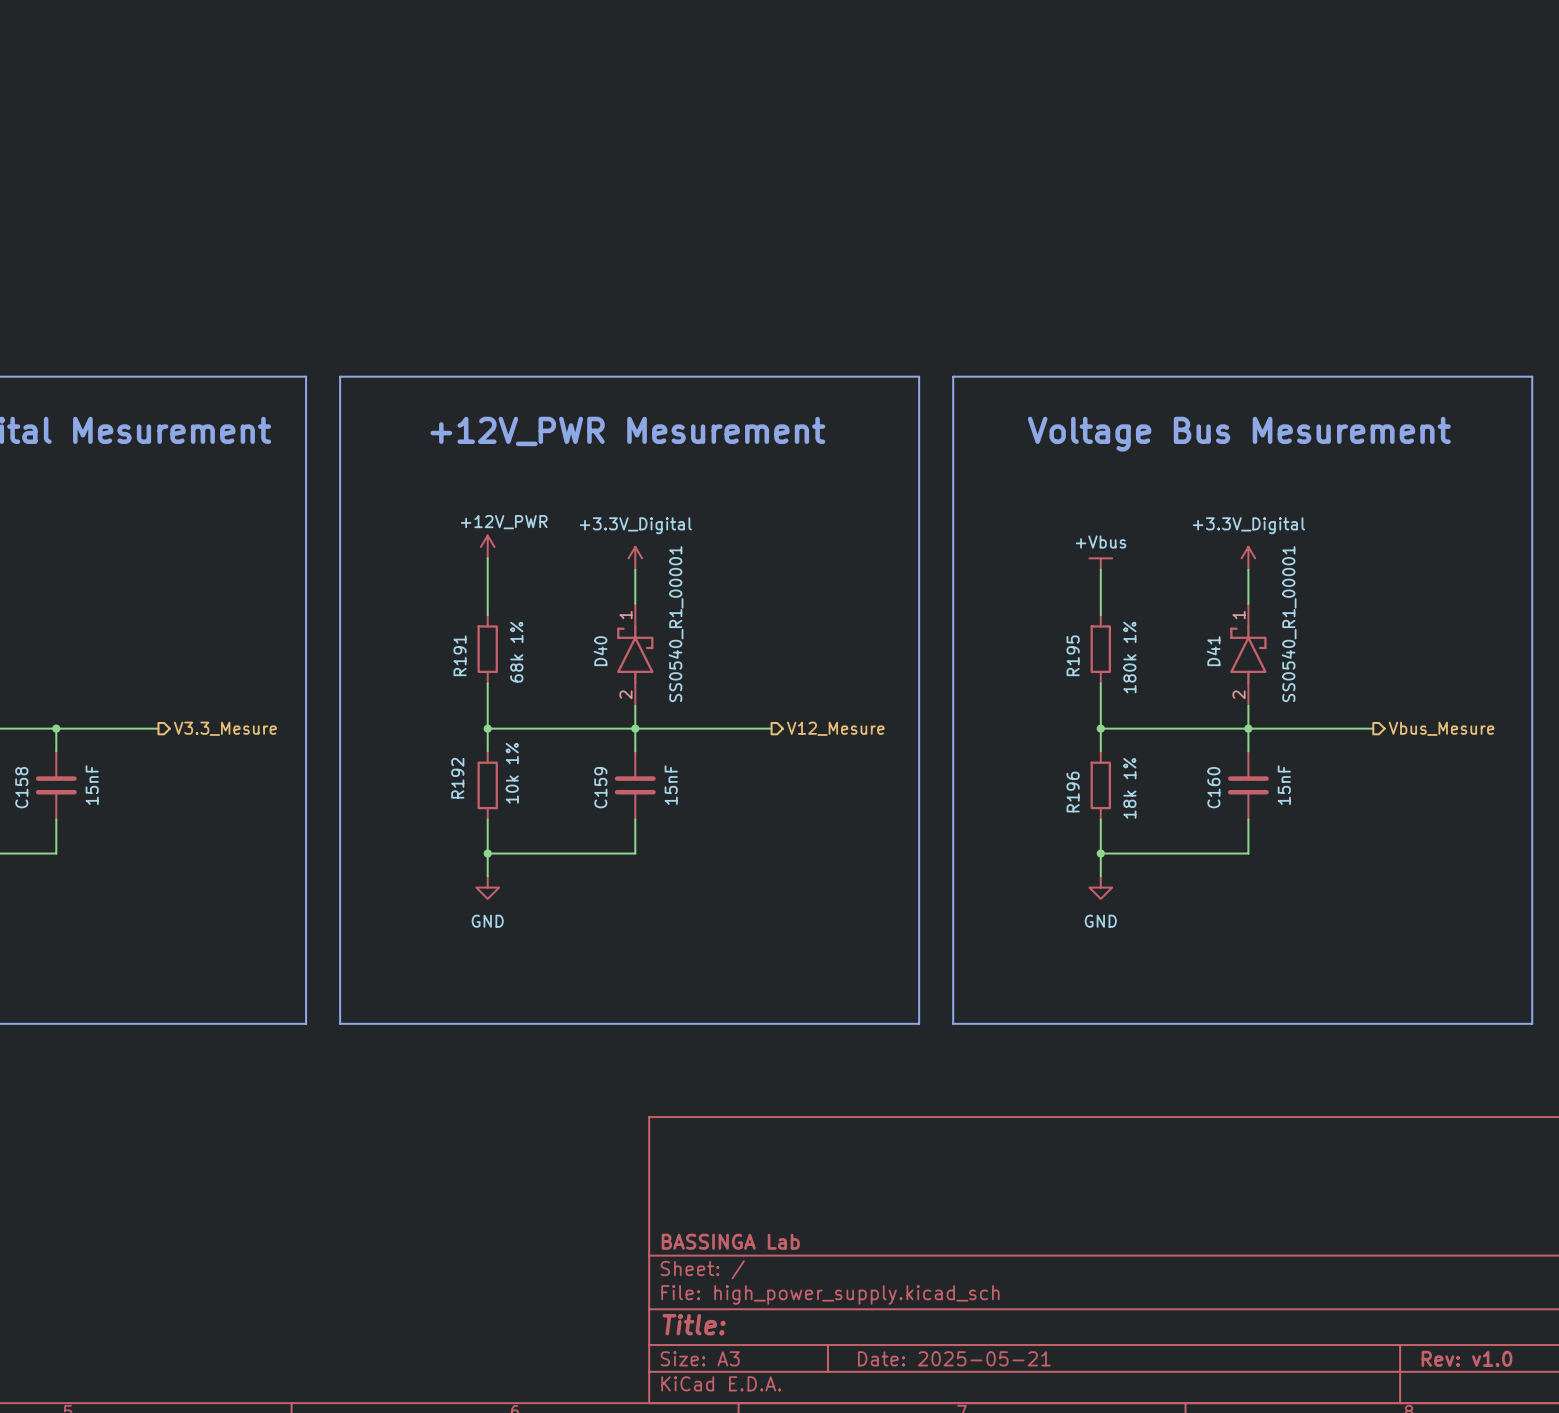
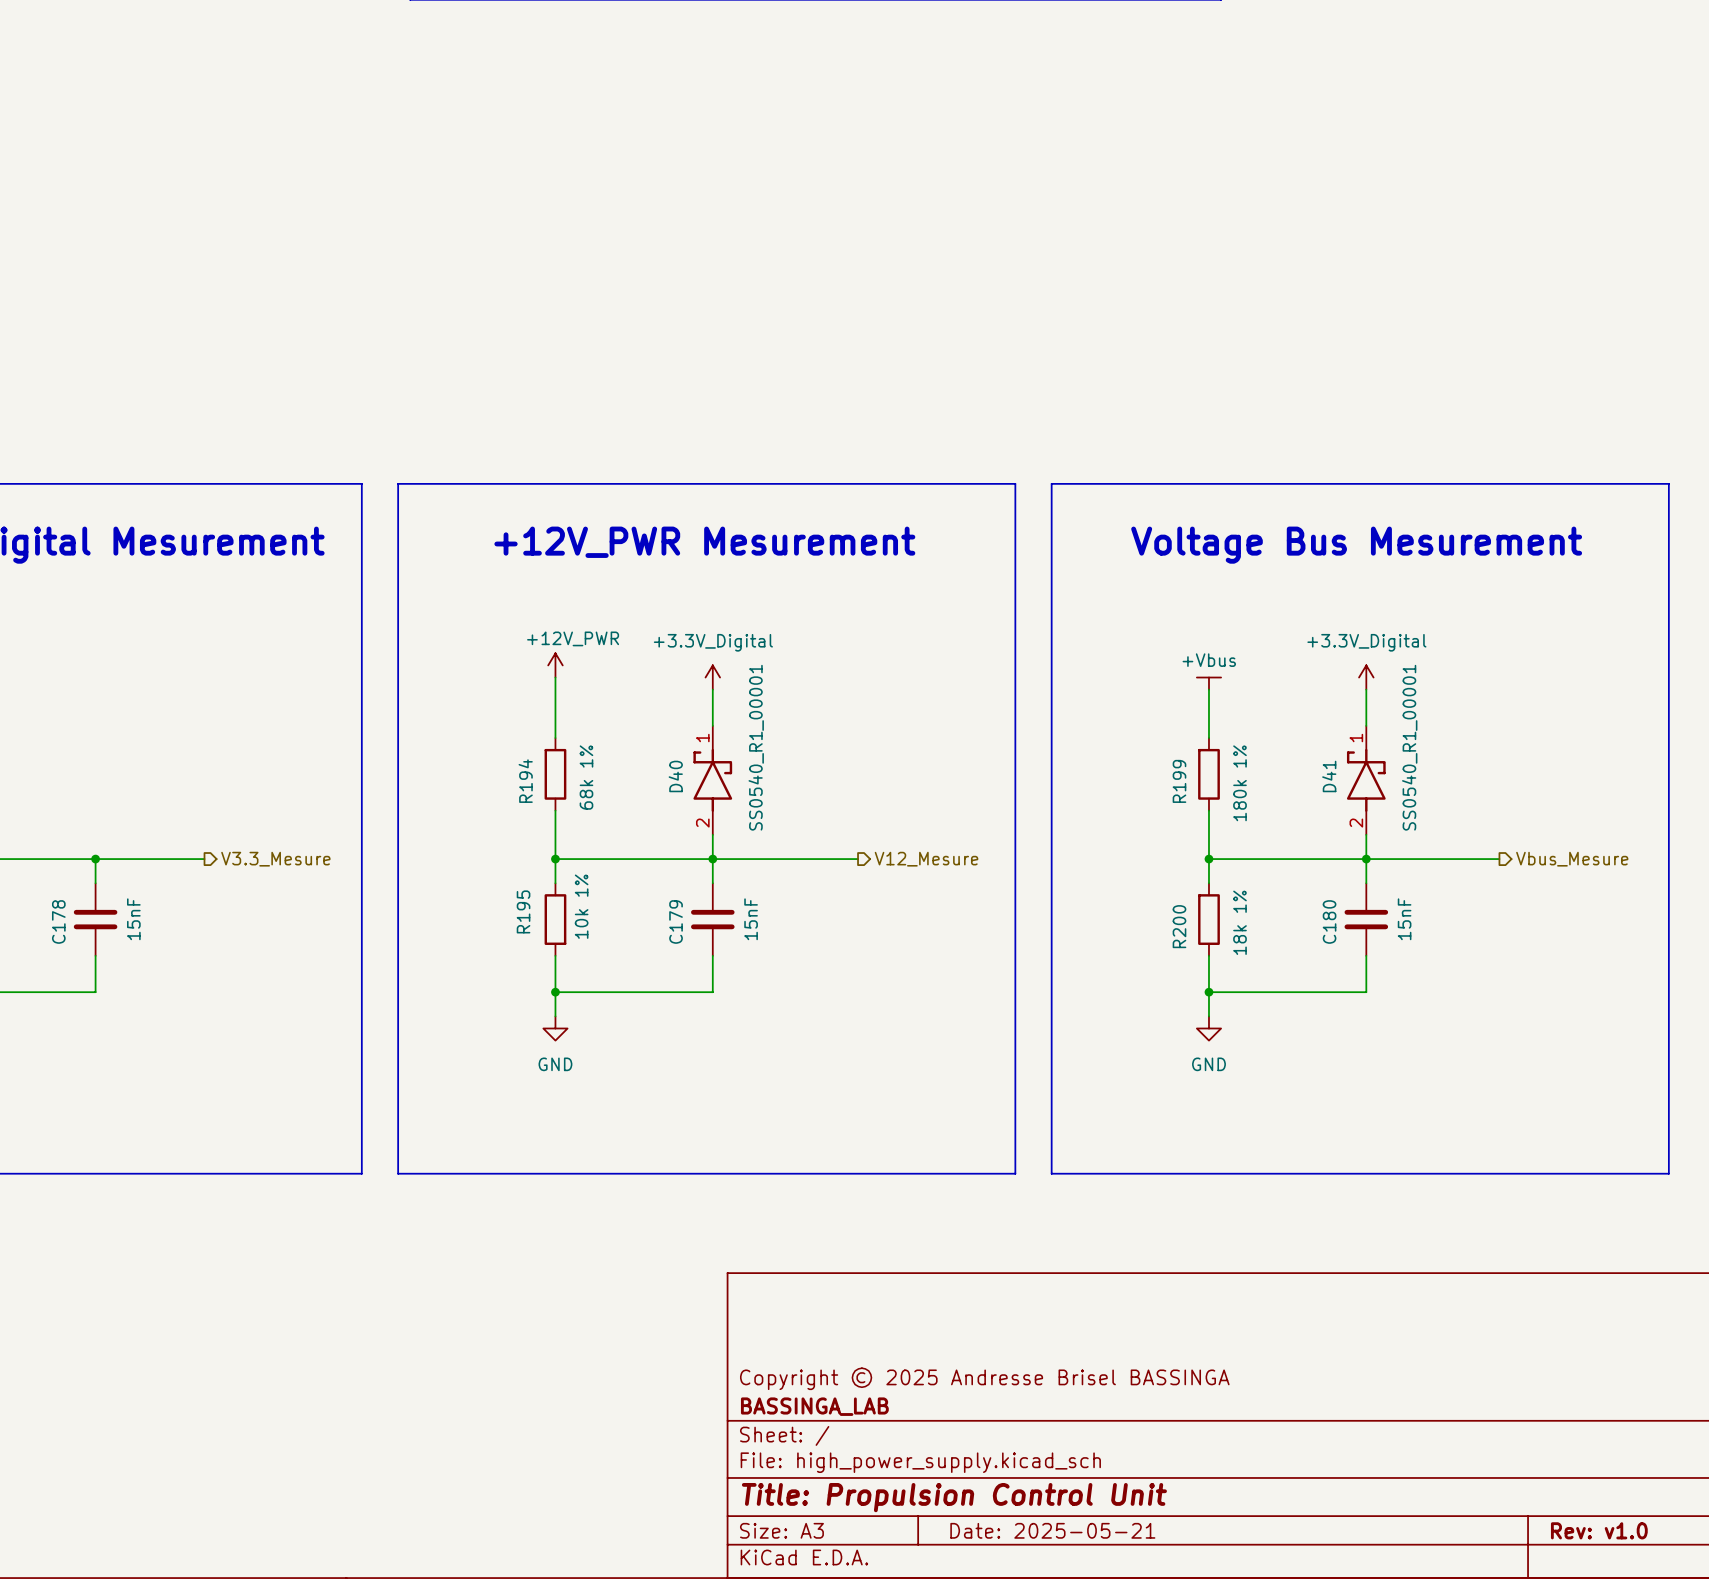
R191 name: R191 (460, 655) -> R194 (525, 781)
R195 name: R195 (1073, 655) -> R199 (1179, 781)
R192 name: R192 (457, 778) -> R195 (523, 911)
C158 name: C158 (21, 787) -> C178 (58, 921)
C159 name: C159 (600, 787) -> C179 (676, 921)
C160 name: C160 (1213, 787) -> C180 (1329, 921)
R196 name: R196 (1073, 792) -> R200 (1179, 926)
title block: none -> Copyright © 2025 Andresse Brisel BASSINGA (984, 1378)
title block: BASSINGA Lab (730, 1241) -> BASSINGA_LAB (814, 1406)
title block: Title: (694, 1324) -> Title: Propulsion Control Unit (954, 1497)

